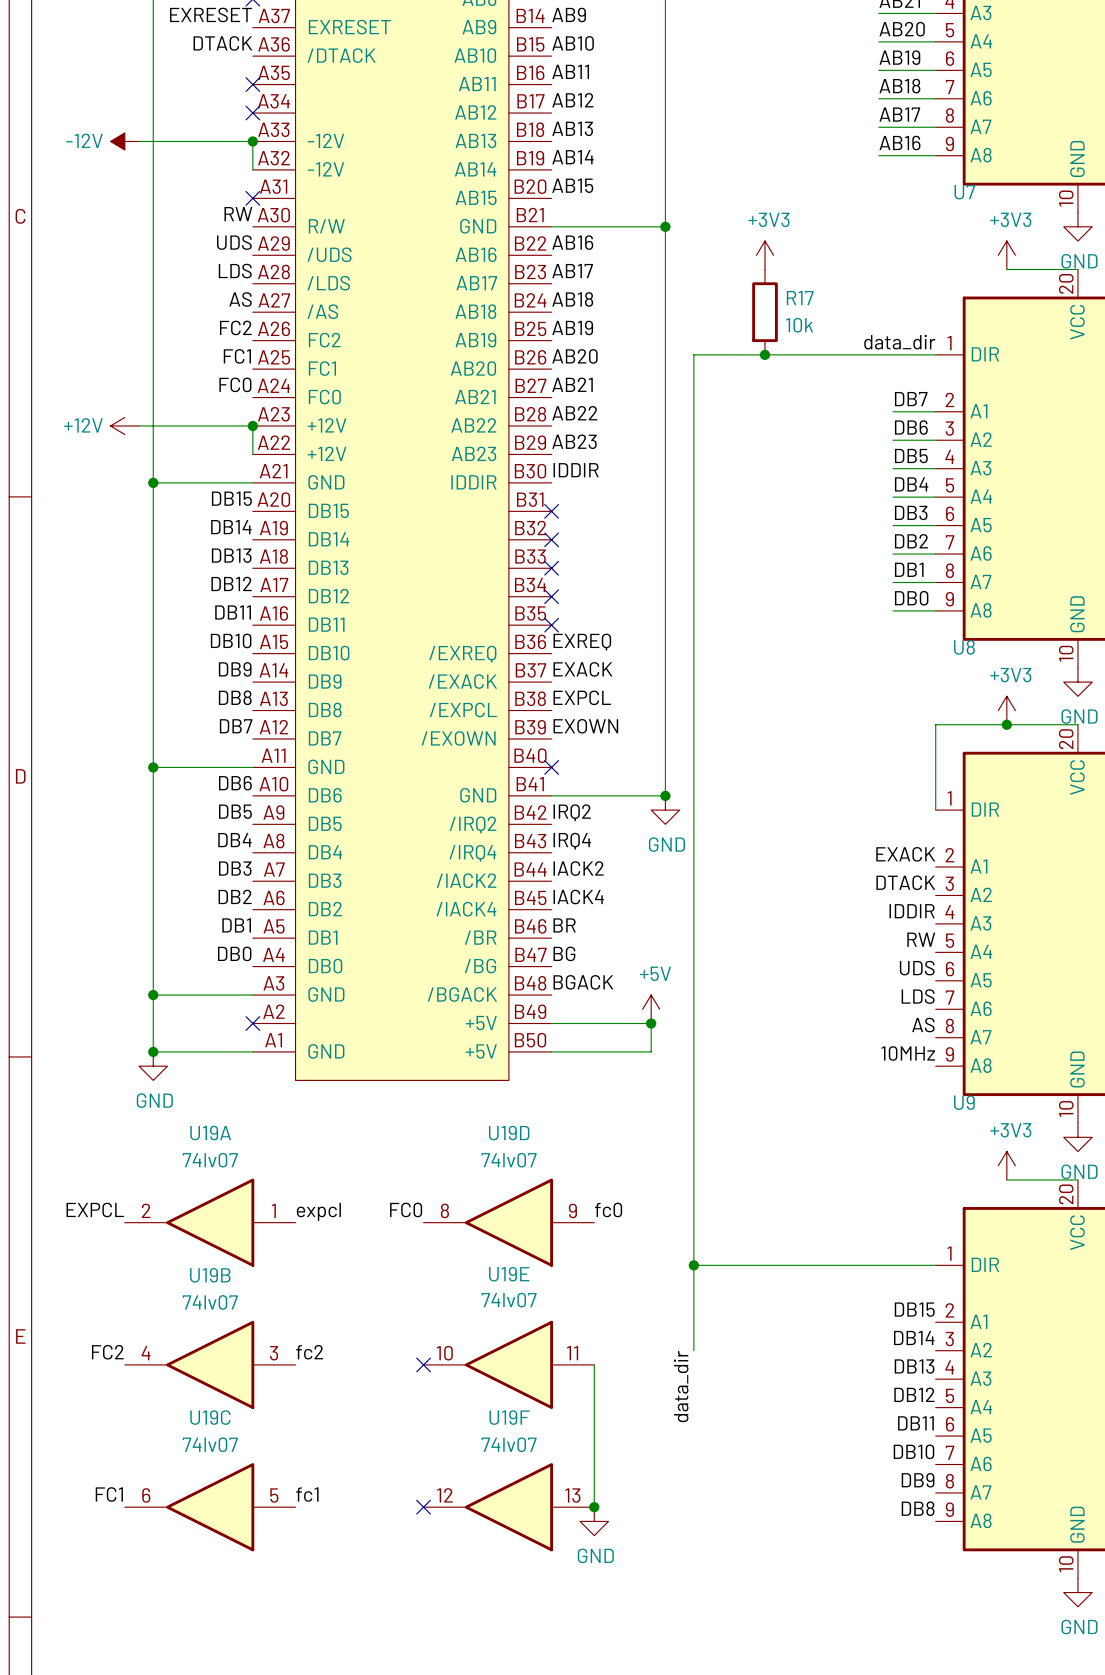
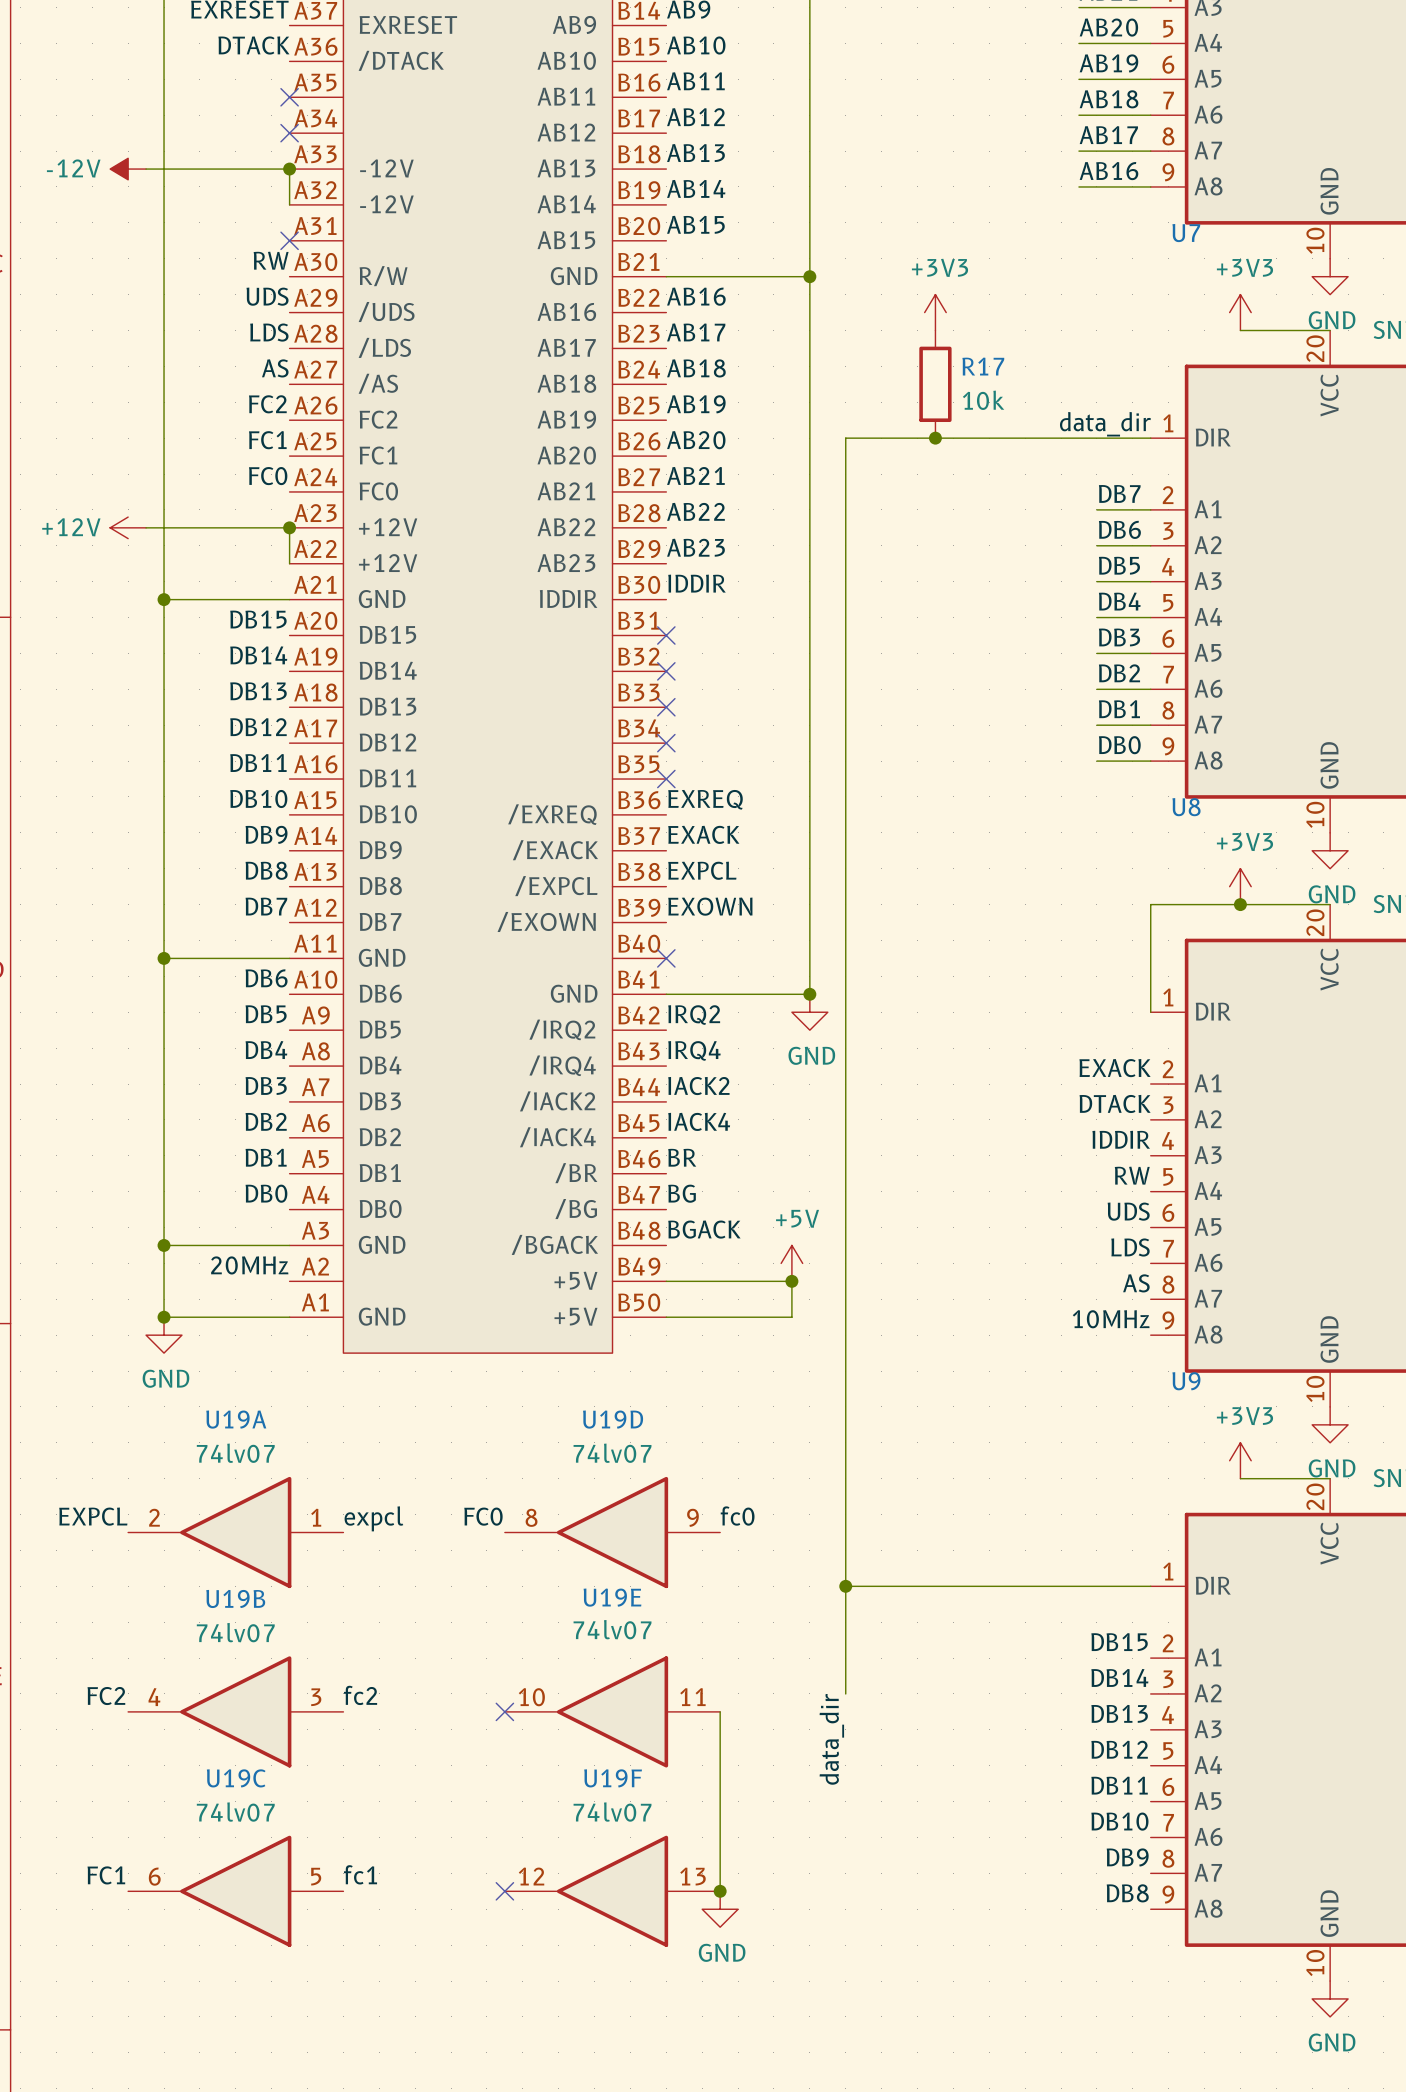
label: none -> 20MHz (249, 1265)
no-connect mark: (252, 1023) -> none

